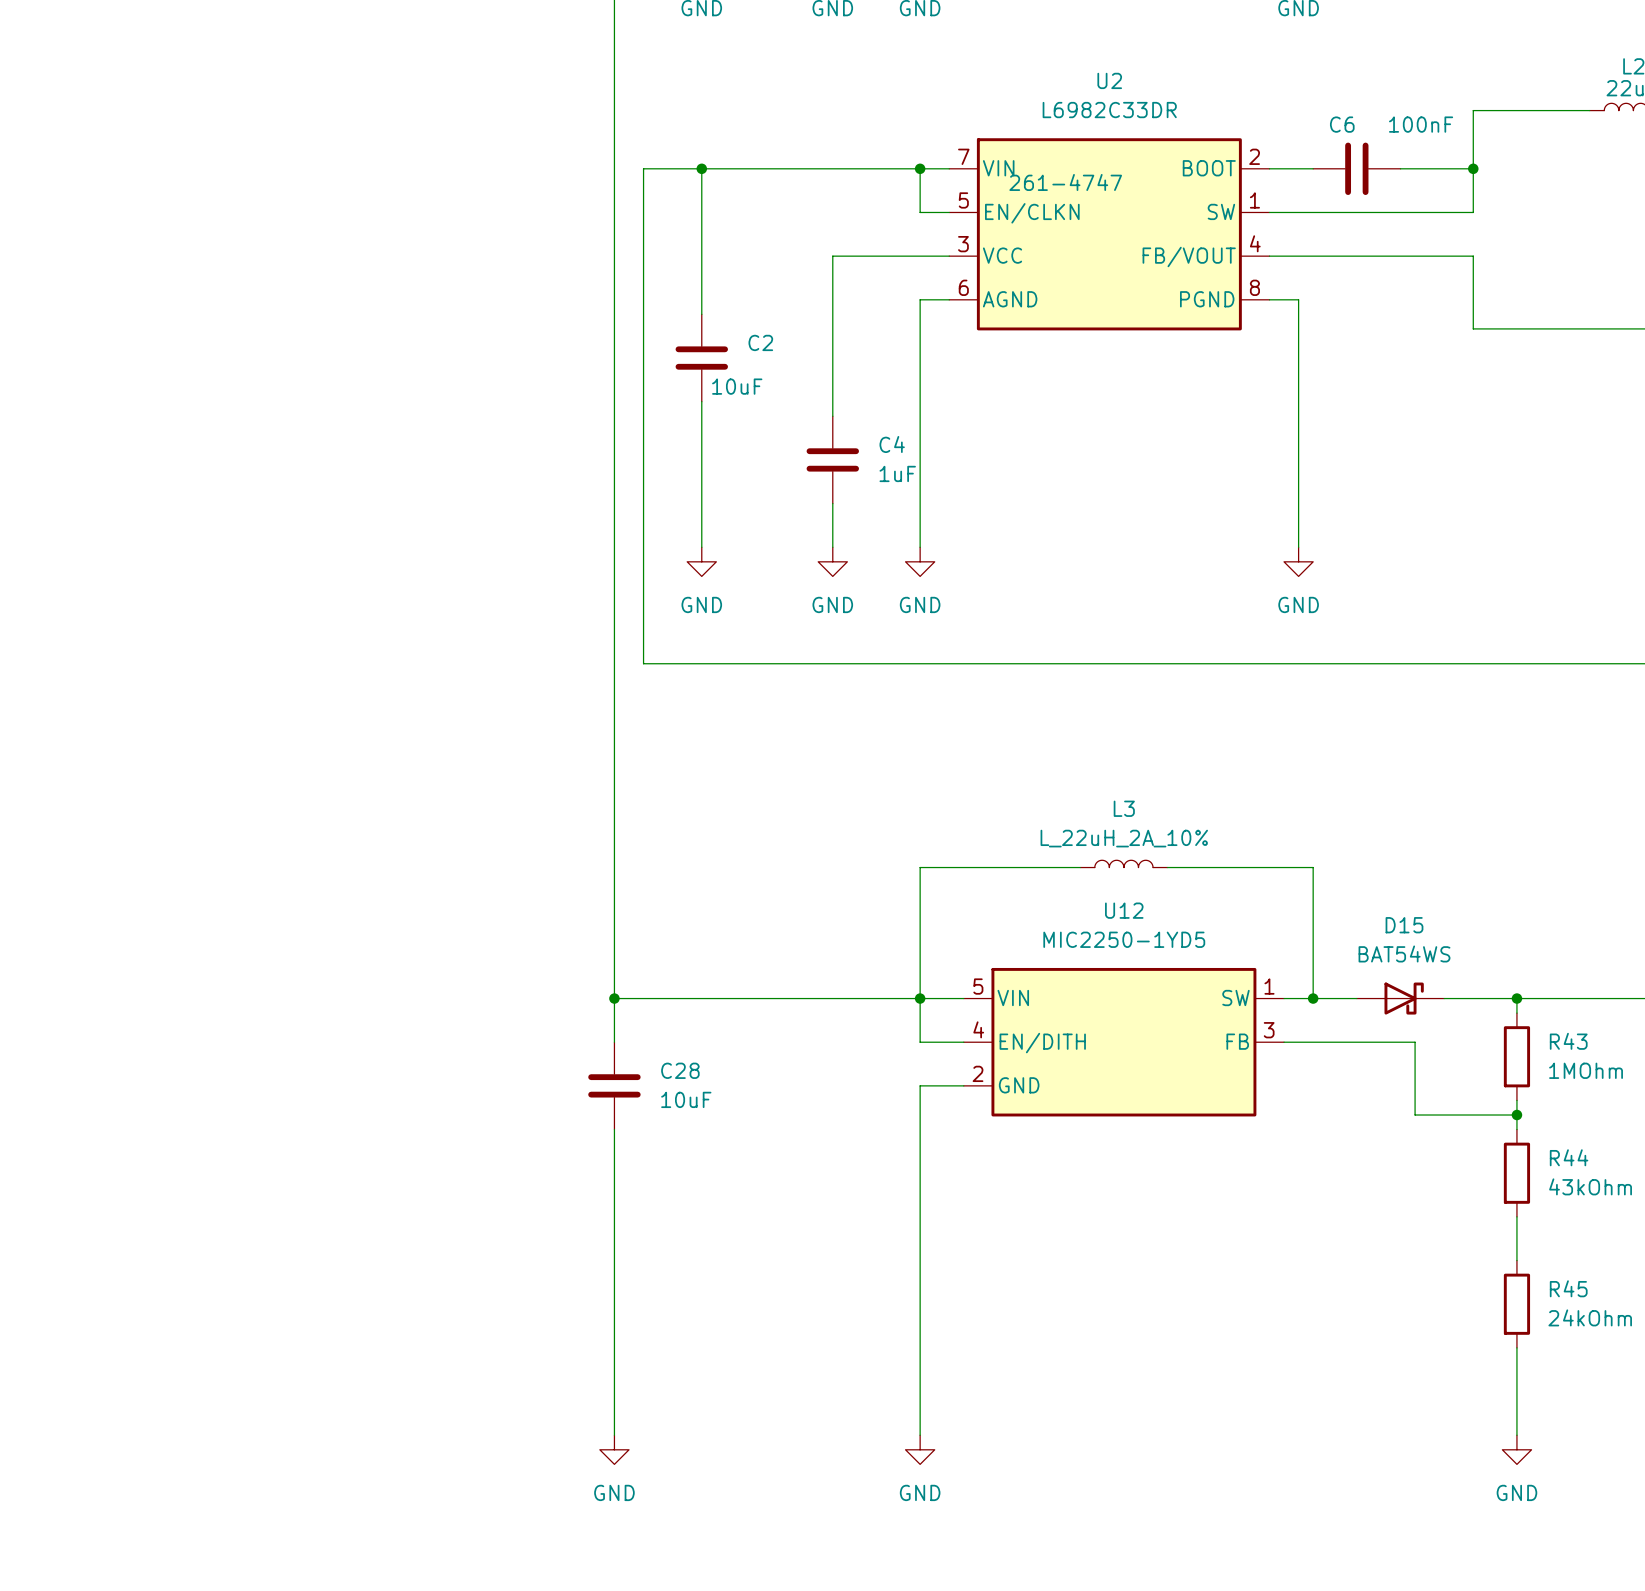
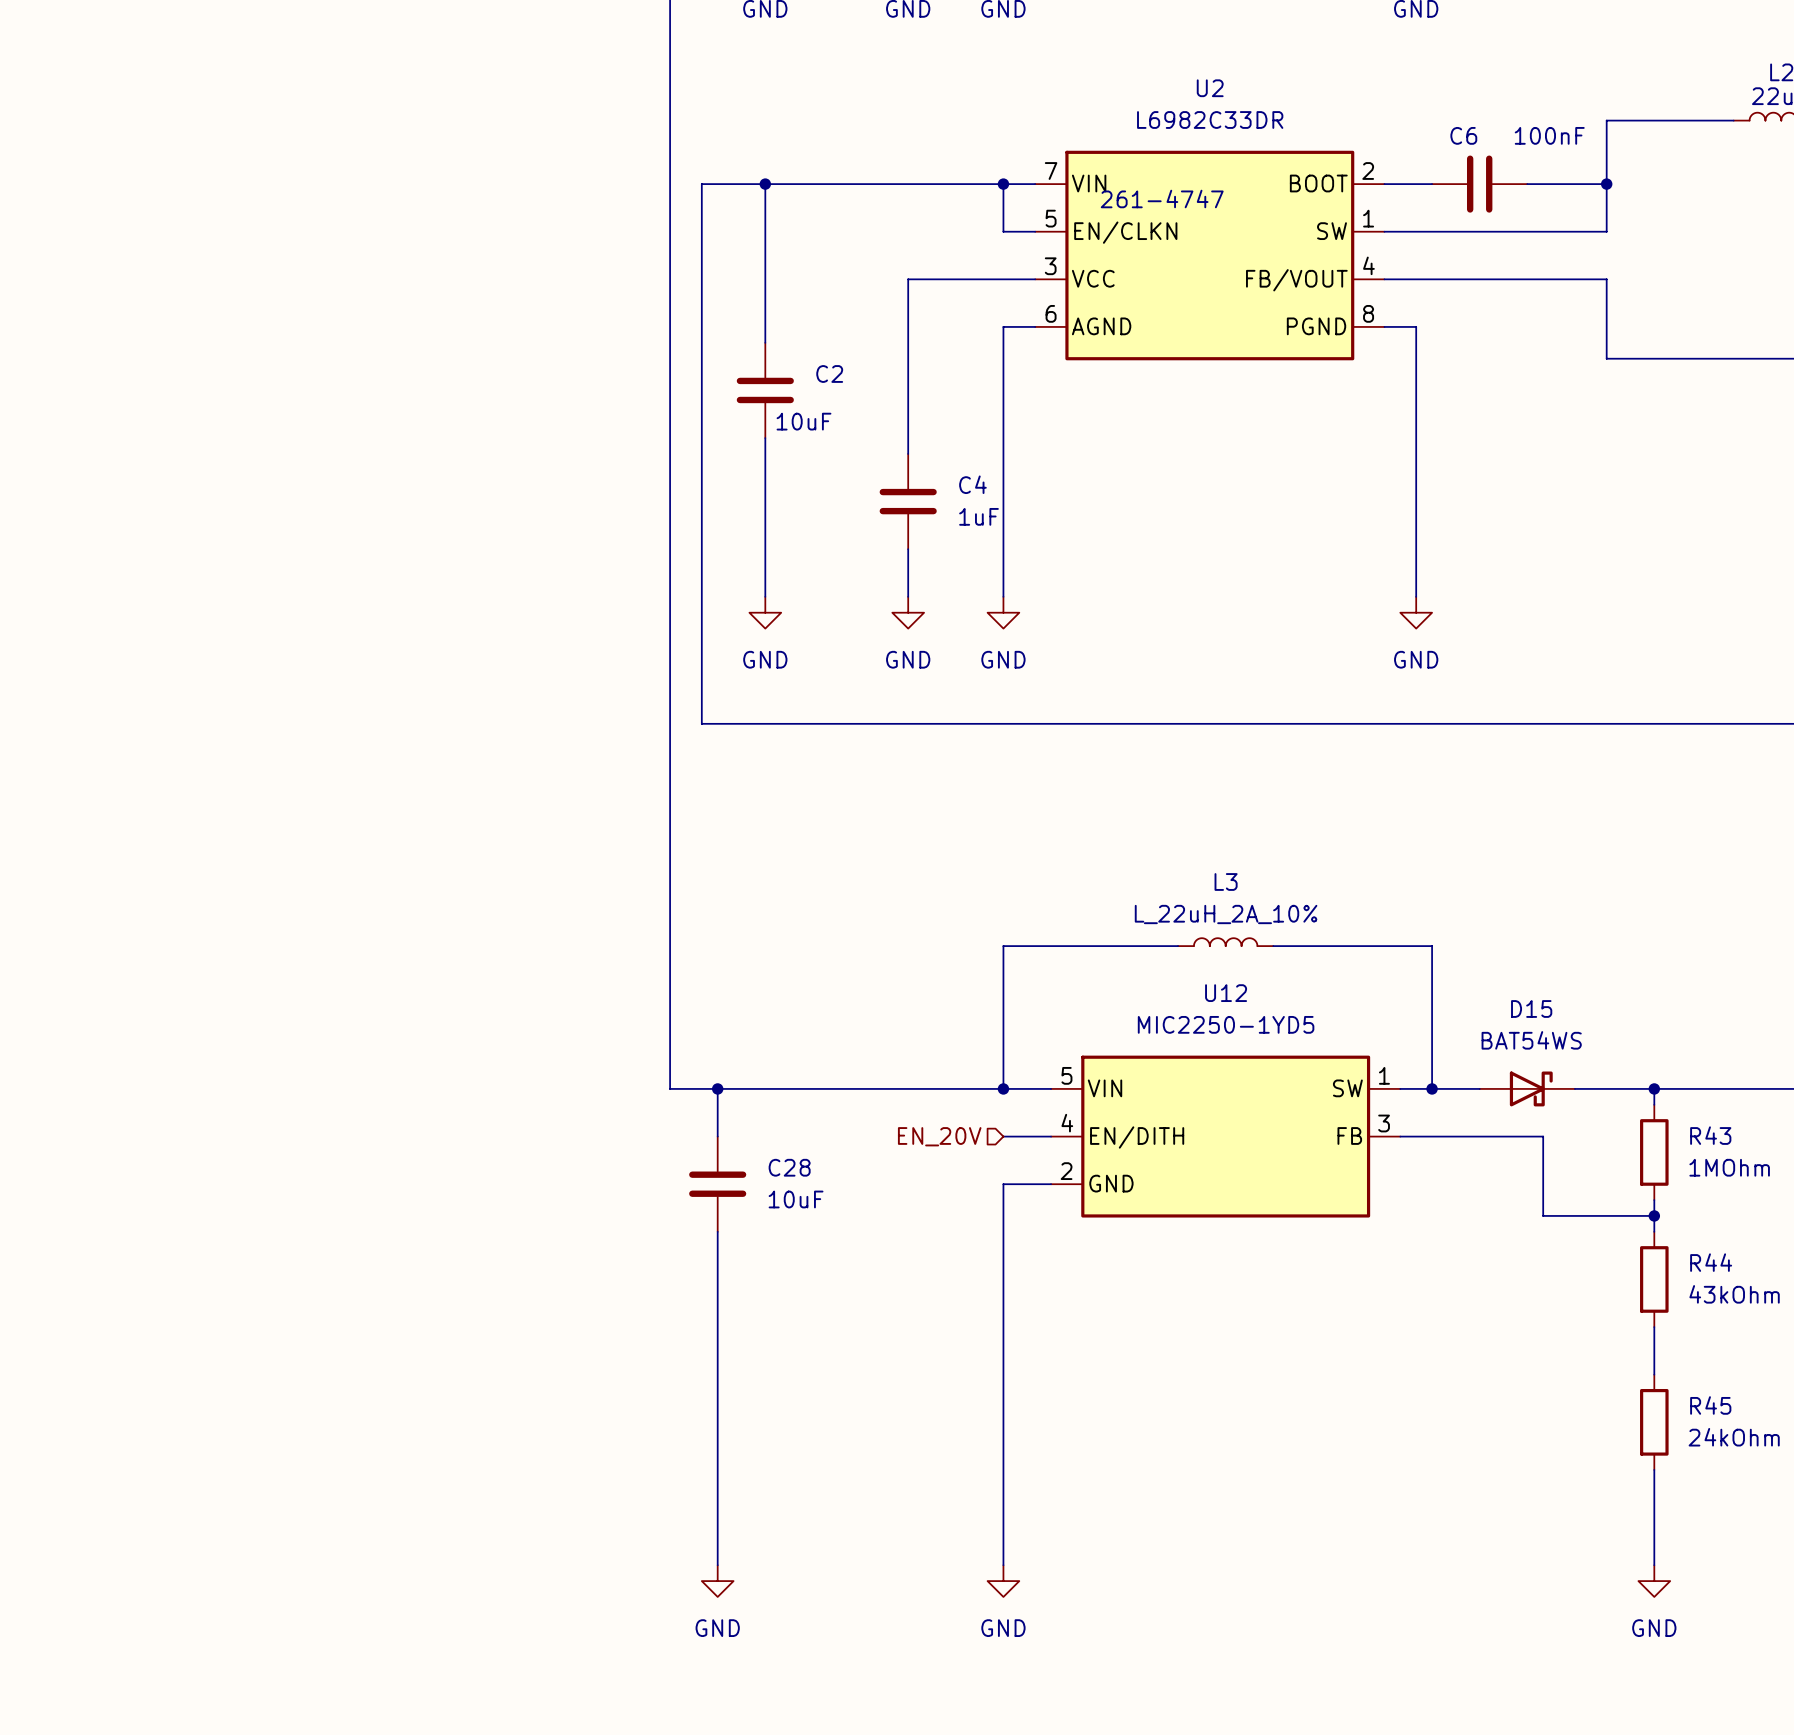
wire: (614, 998) (614, 1042) -> (717, 1088) (717, 1136)
junction position: (614, 998) -> (717, 1088)
wire: (920, 998) (920, 1042) -> none
hierarchical label: none -> EN_20V (939, 1136)
C28 position: (614, 1085) -> (717, 1184)
wire: (614, 1129) (614, 1435) -> (717, 1231) (717, 1565)
power symbol position: GND (614, 1449) -> GND (717, 1581)

